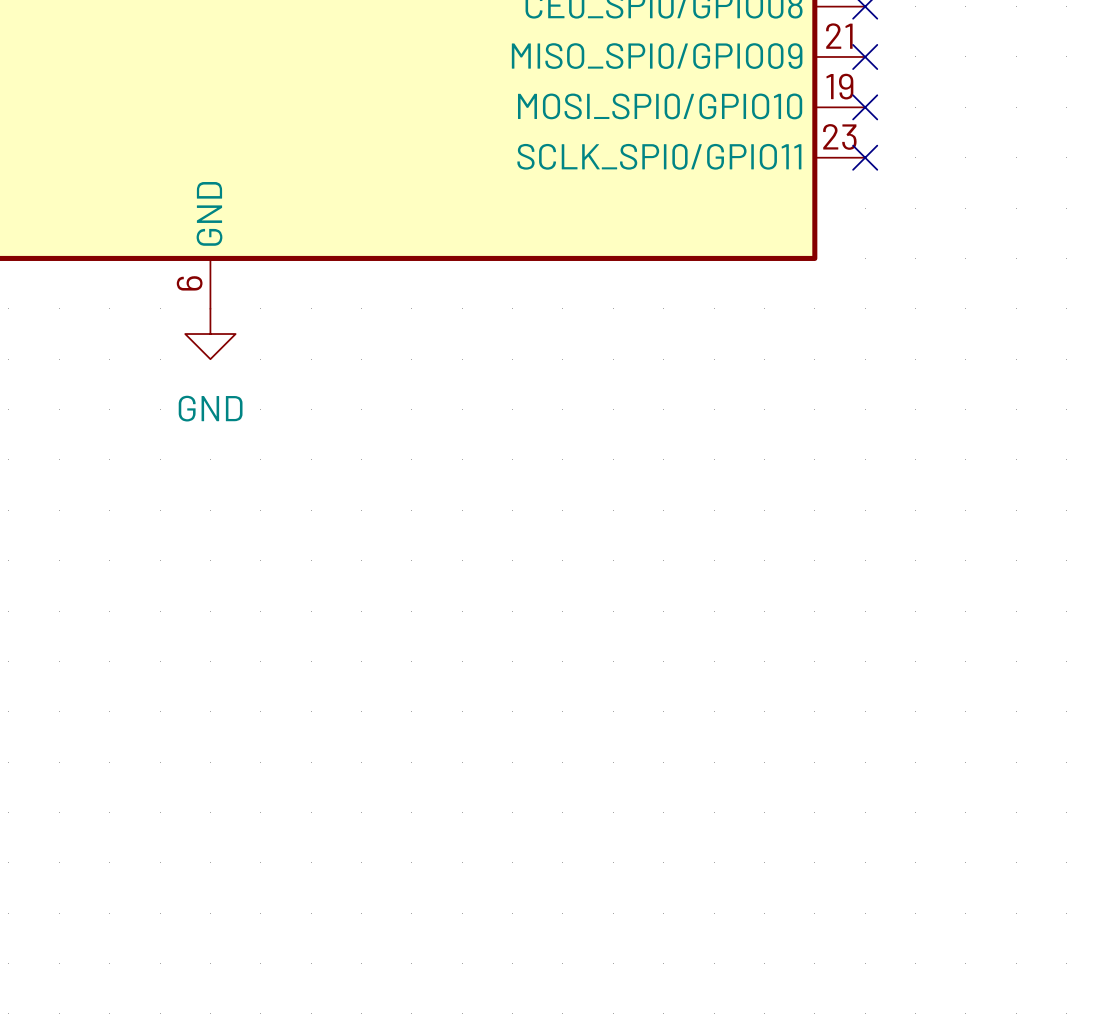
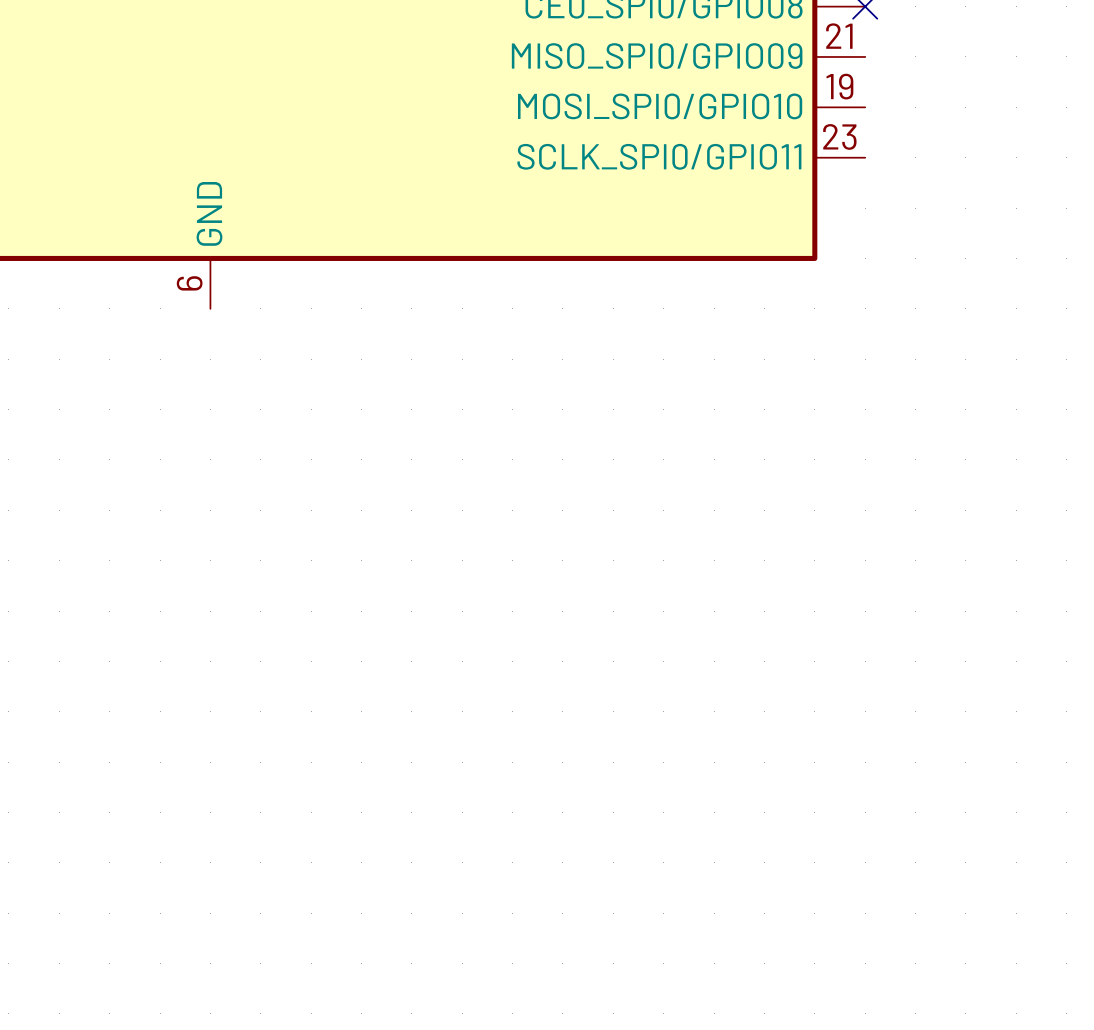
no-connect mark: (865, 56) -> none
no-connect mark: (865, 107) -> none
no-connect mark: (865, 157) -> none
power symbol: GND (210, 334) -> none

